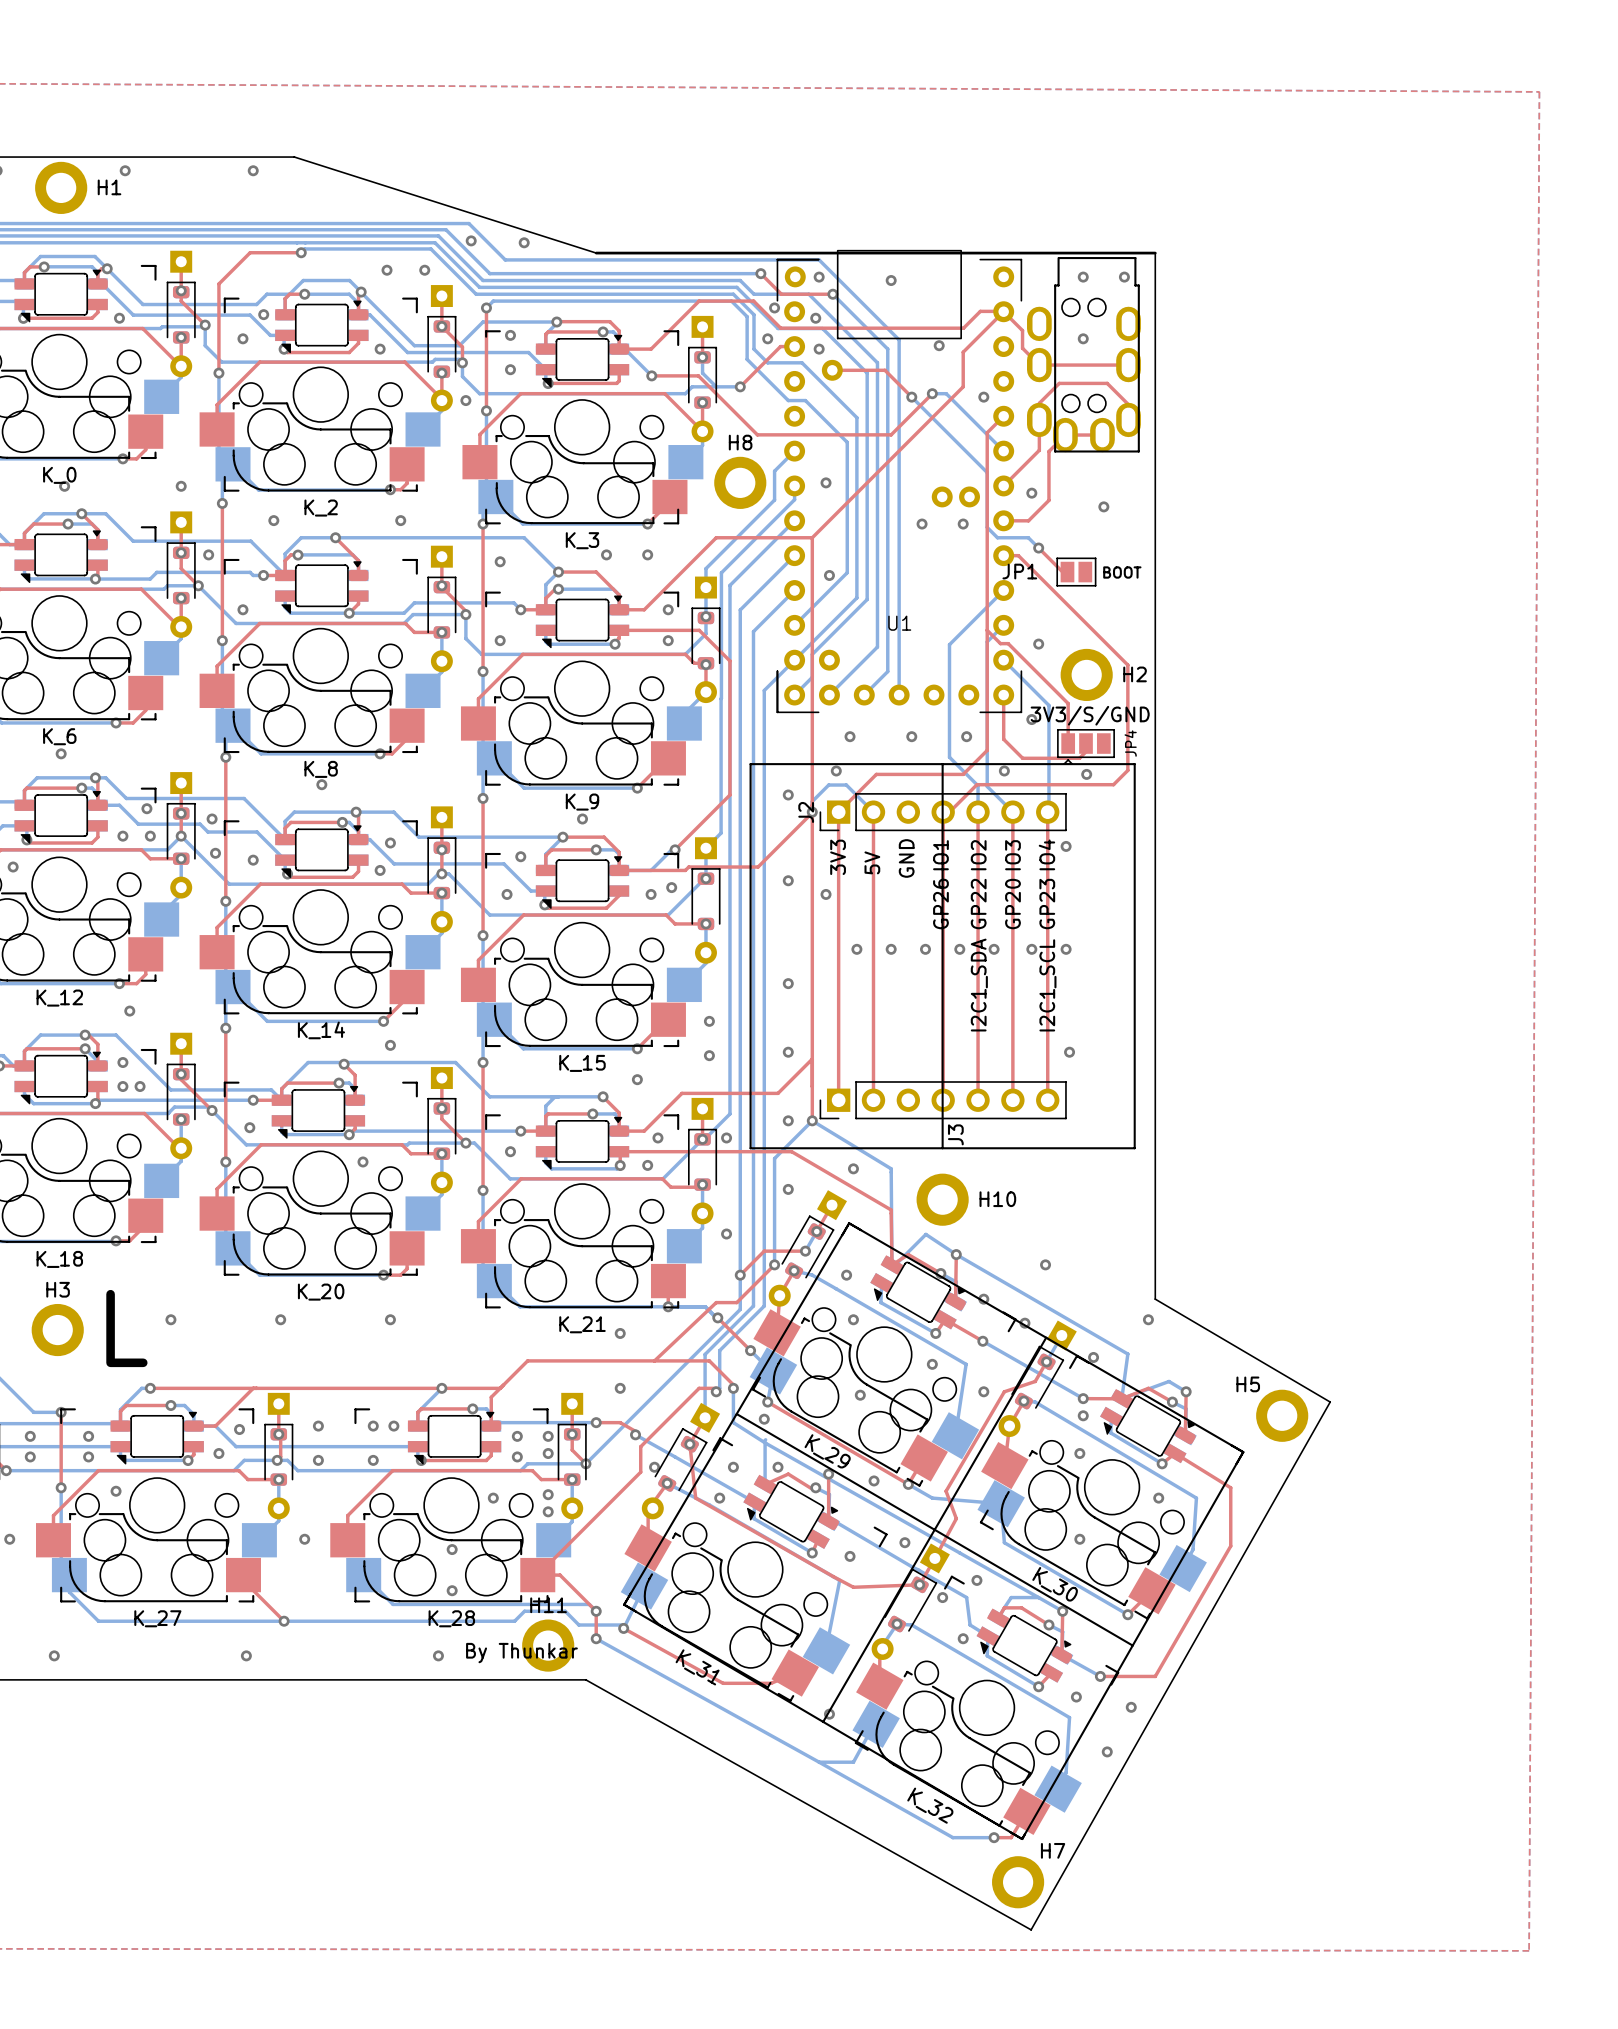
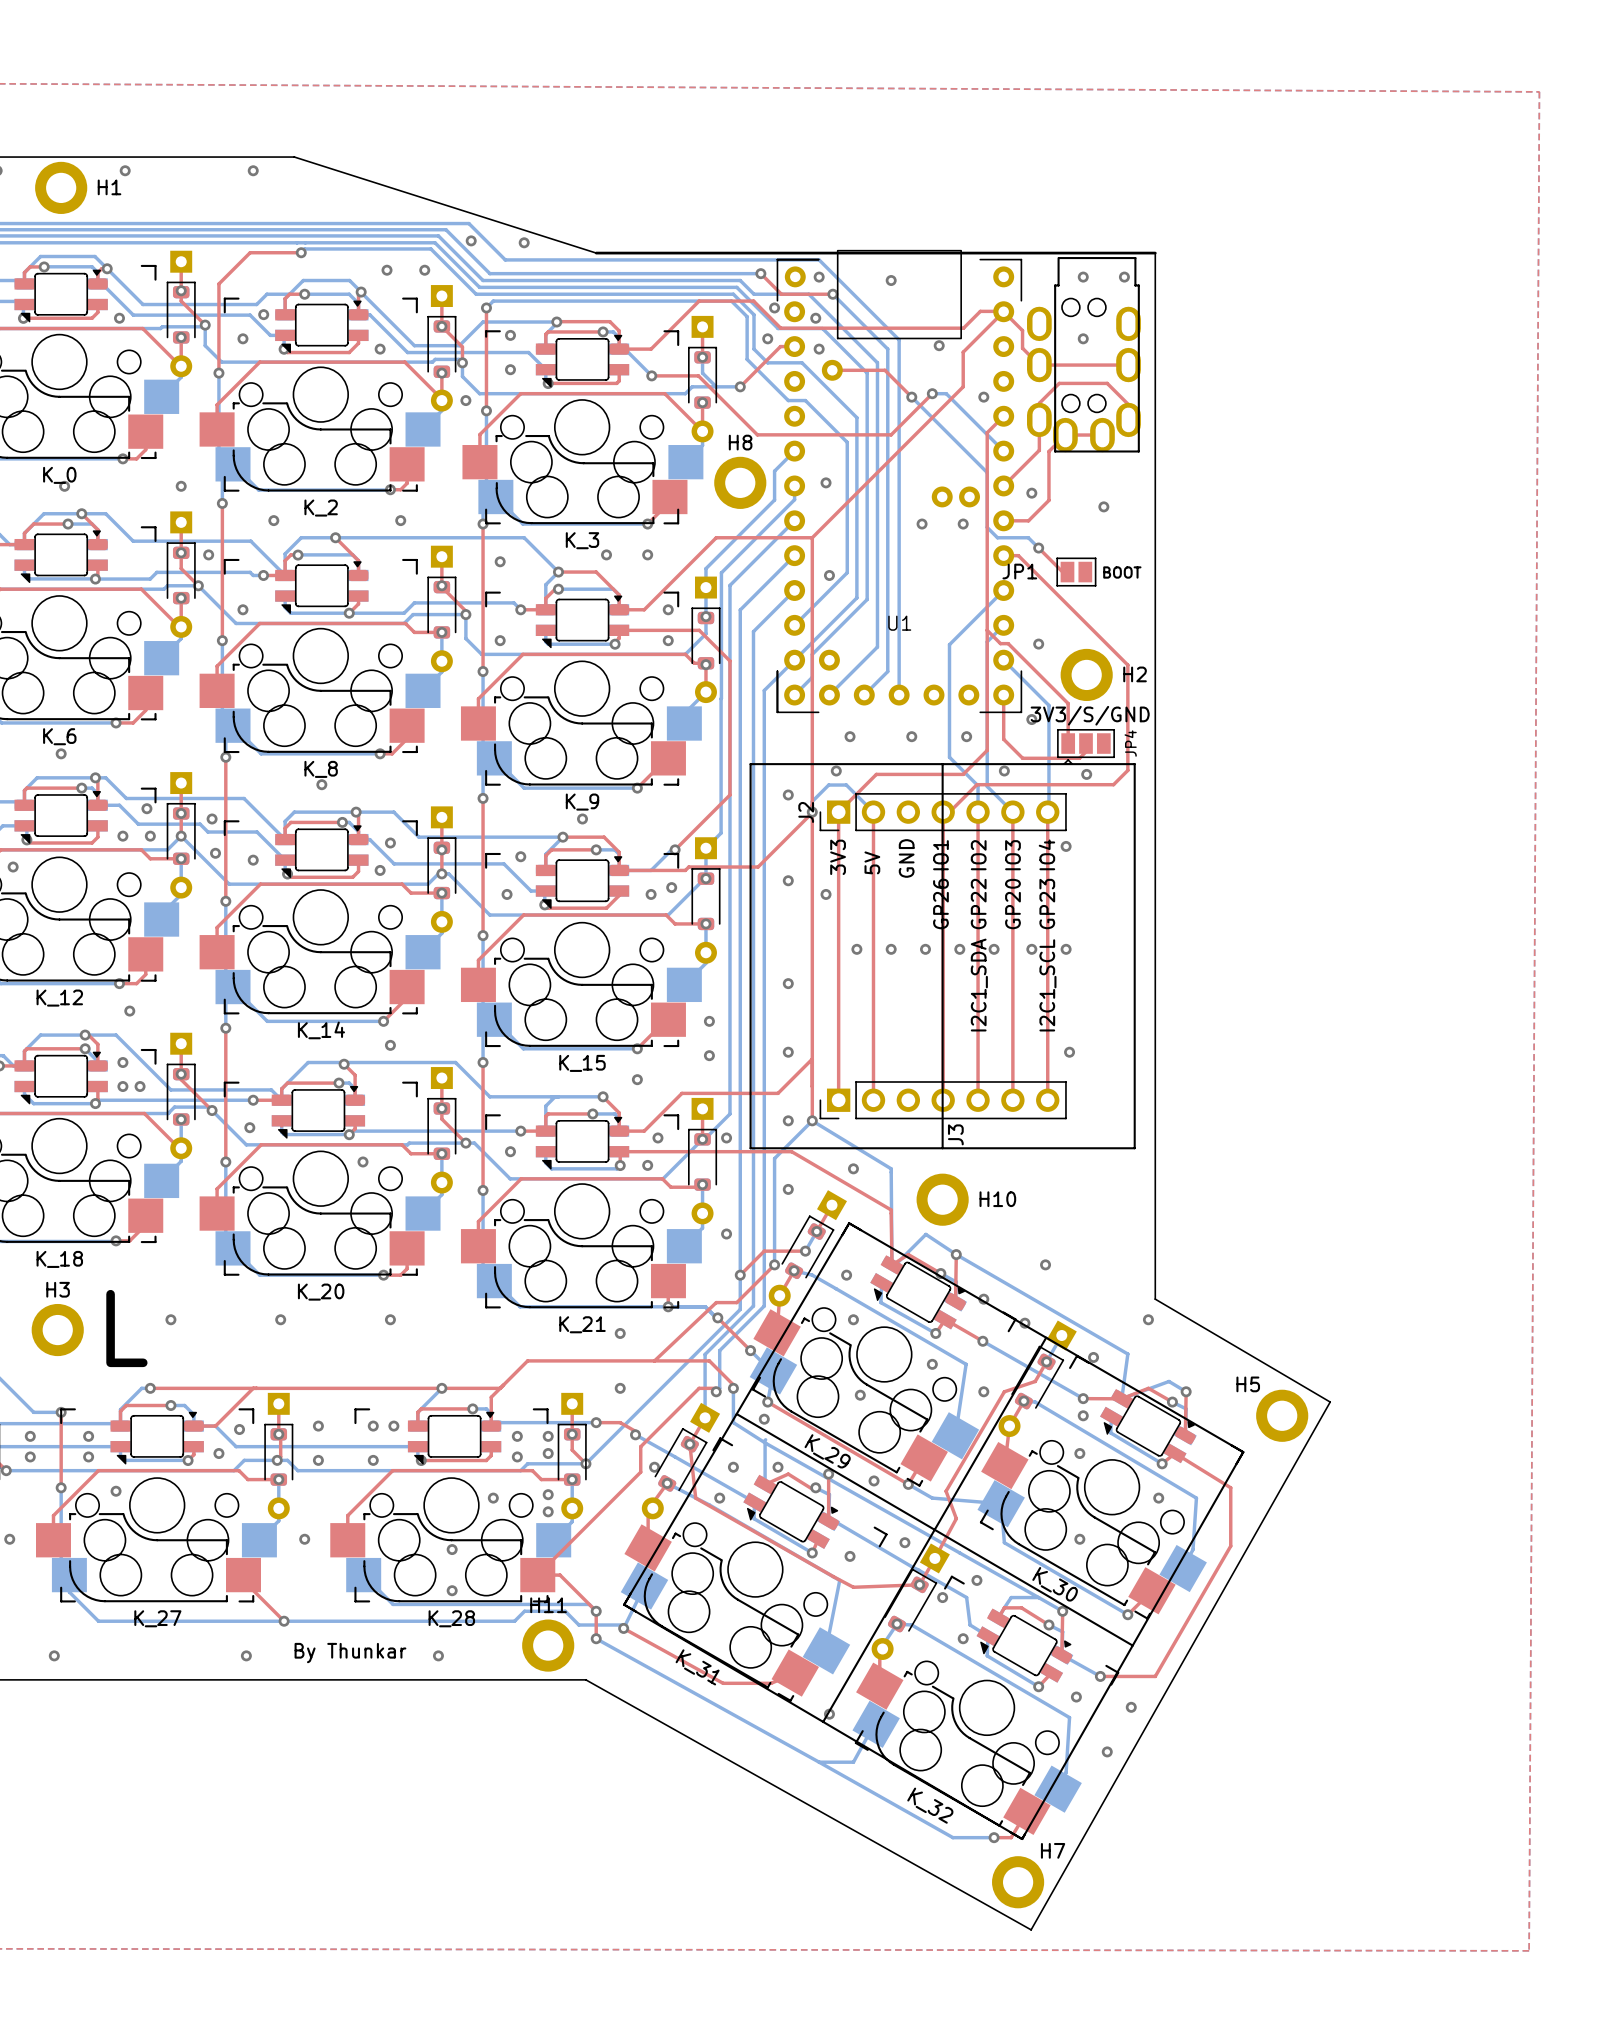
text position: By Thunkar (521, 1653) -> By Thunkar (350, 1653)

